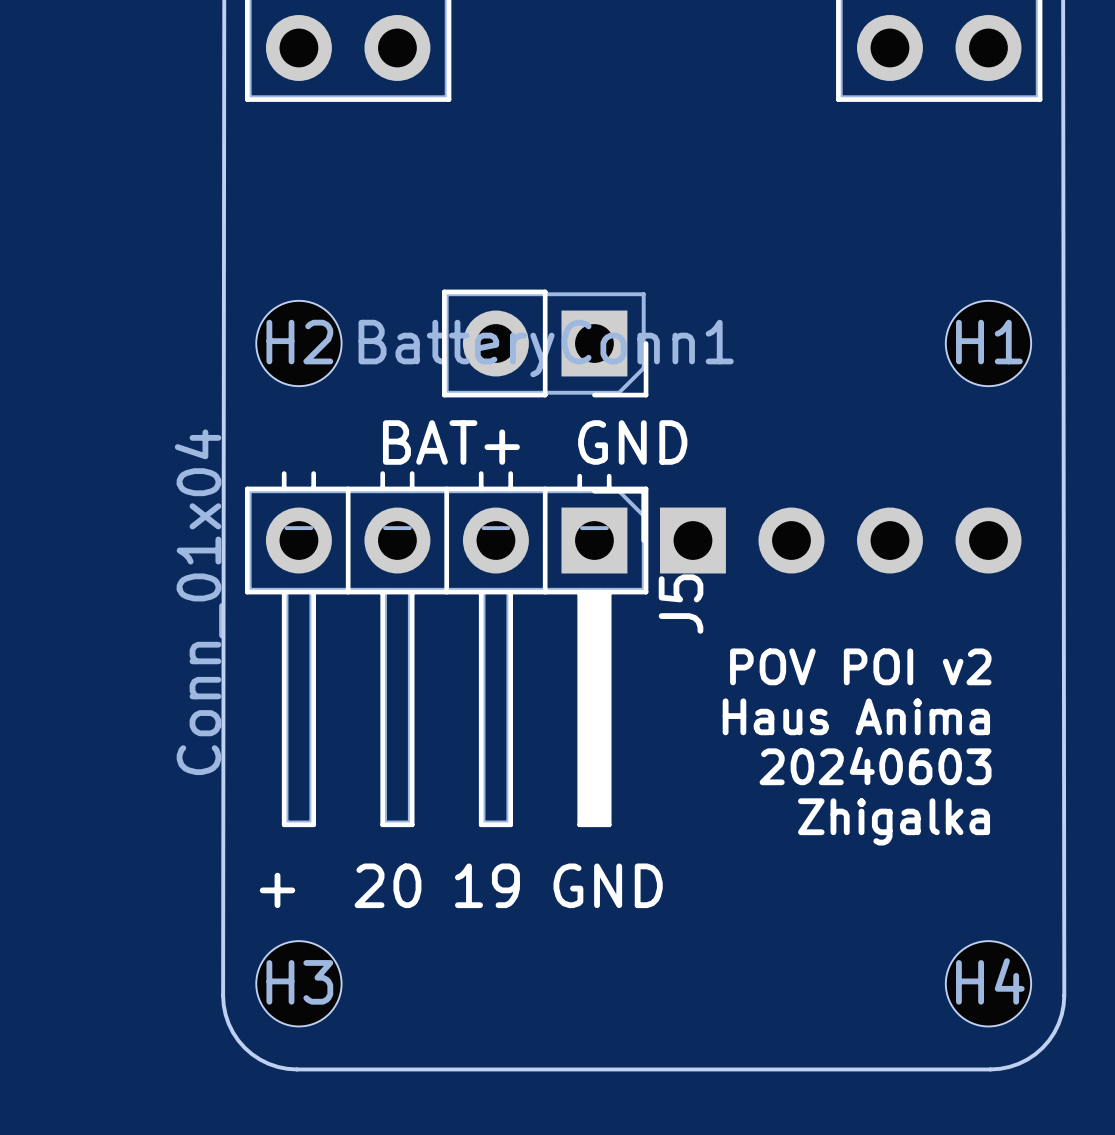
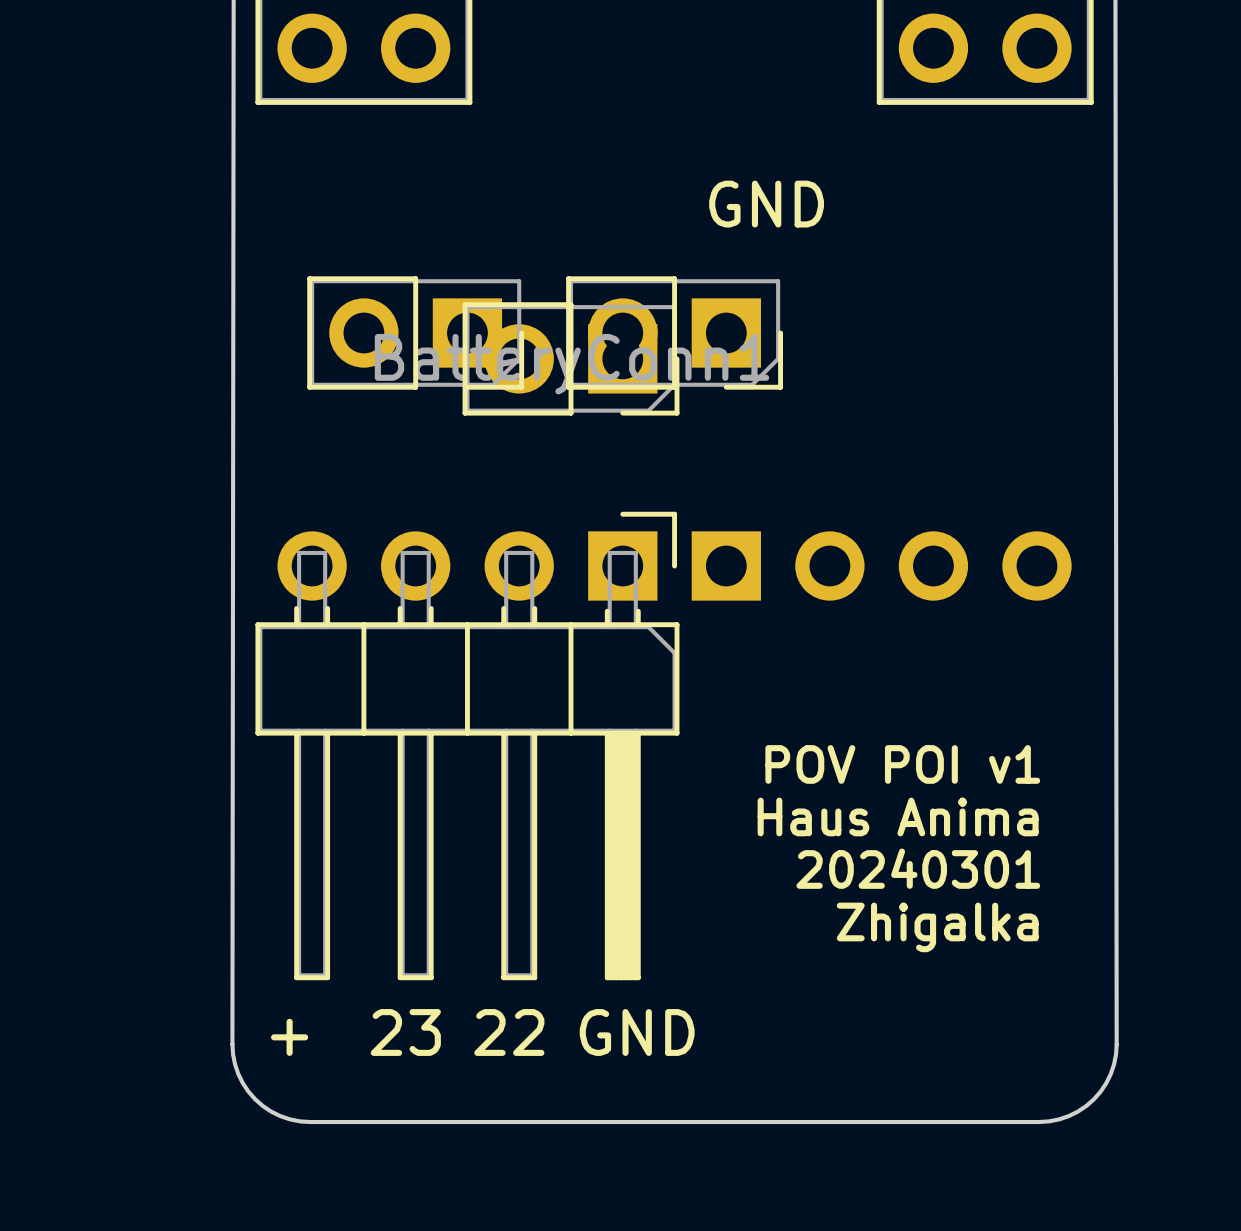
part: none -> (415, 333)
part: none -> (674, 333)
H2: (298, 343) -> none
H1: (988, 343) -> none
text: BAT+ (451, 442) -> none
text position: GND (632, 442) -> GND (766, 204)
J5: Conn_01x04 (446, 649) -> none
text: POV POI v2 (860, 666) -> POV POI v1 (902, 764)
part: none -> (467, 745)
text position: Haus Anima (856, 716) -> Haus Anima (898, 816)
text: 20240603 (875, 766) -> 20240301 (918, 868)
text position: Zhigalka (894, 821) -> Zhigalka (937, 927)
text: 20 (388, 885) -> none
text: 19 (487, 885) -> none
text position: GND (608, 885) -> GND (637, 1032)
text position: + (277, 890) -> + (289, 1037)
H3: (298, 983) -> none
H4: (988, 983) -> none
text: none -> 23 (405, 1032)
text: none -> 22 (509, 1032)

